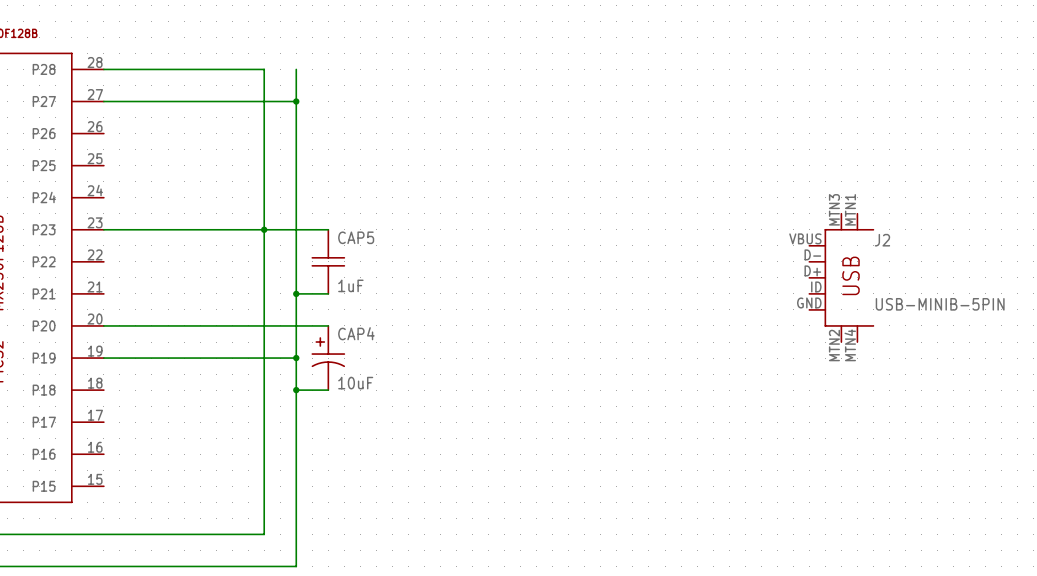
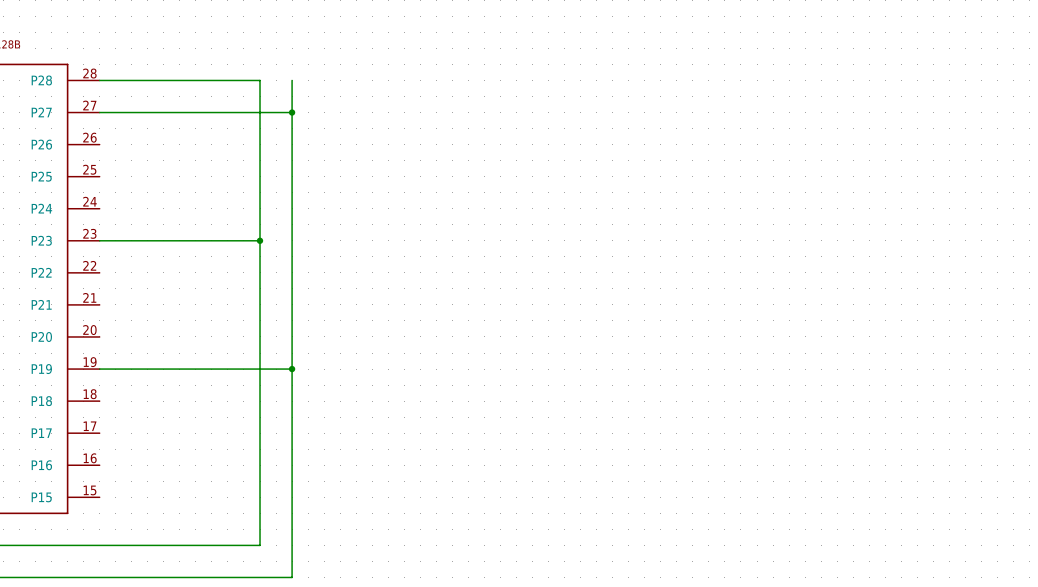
wire: (264, 229) (328, 229) -> none
CAP5: 1uF (328, 261) -> none
J2: USB-MINIB-5PIN (841, 277) -> none
wire: (296, 293) (328, 293) -> none
junction: (296, 293) -> none
wire: (103, 325) (328, 325) -> none
CAP4: 10uF (328, 358) -> none
wire: (296, 390) (328, 390) -> none
junction: (296, 390) -> none

